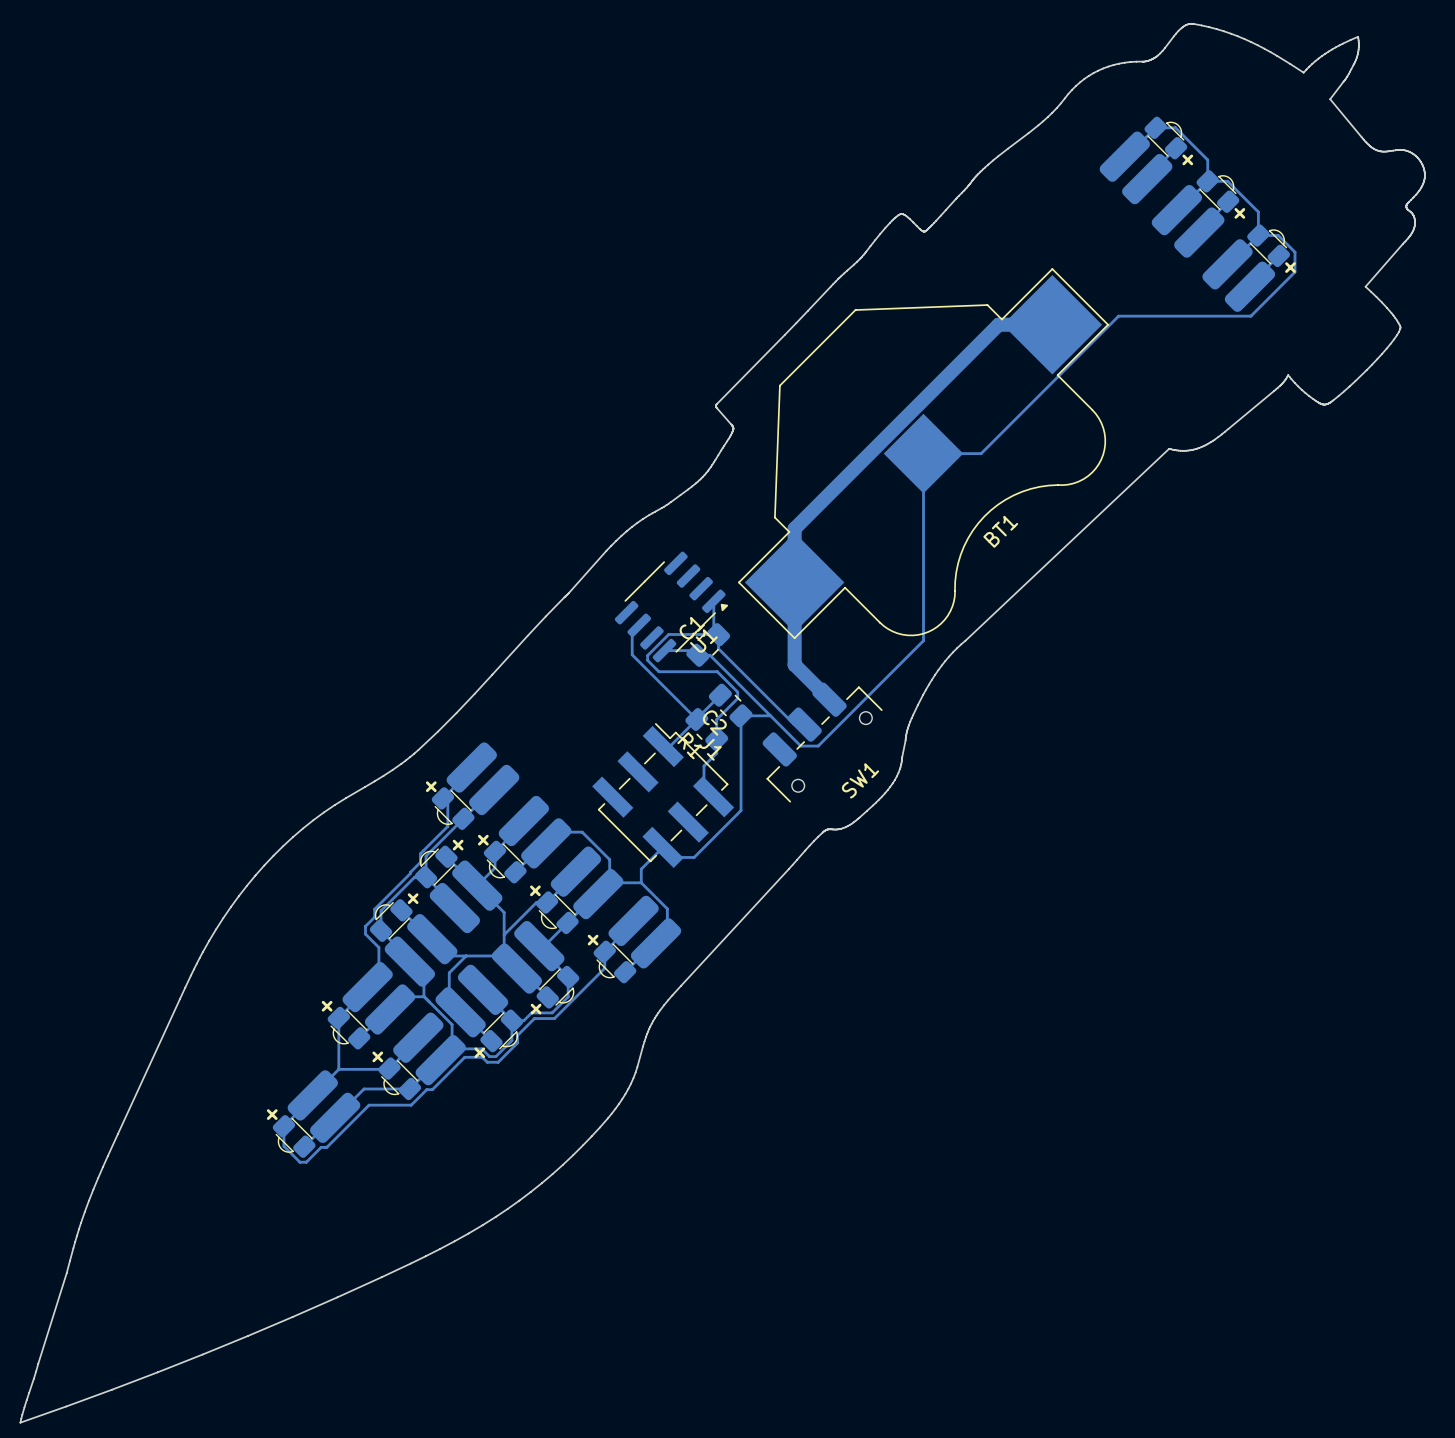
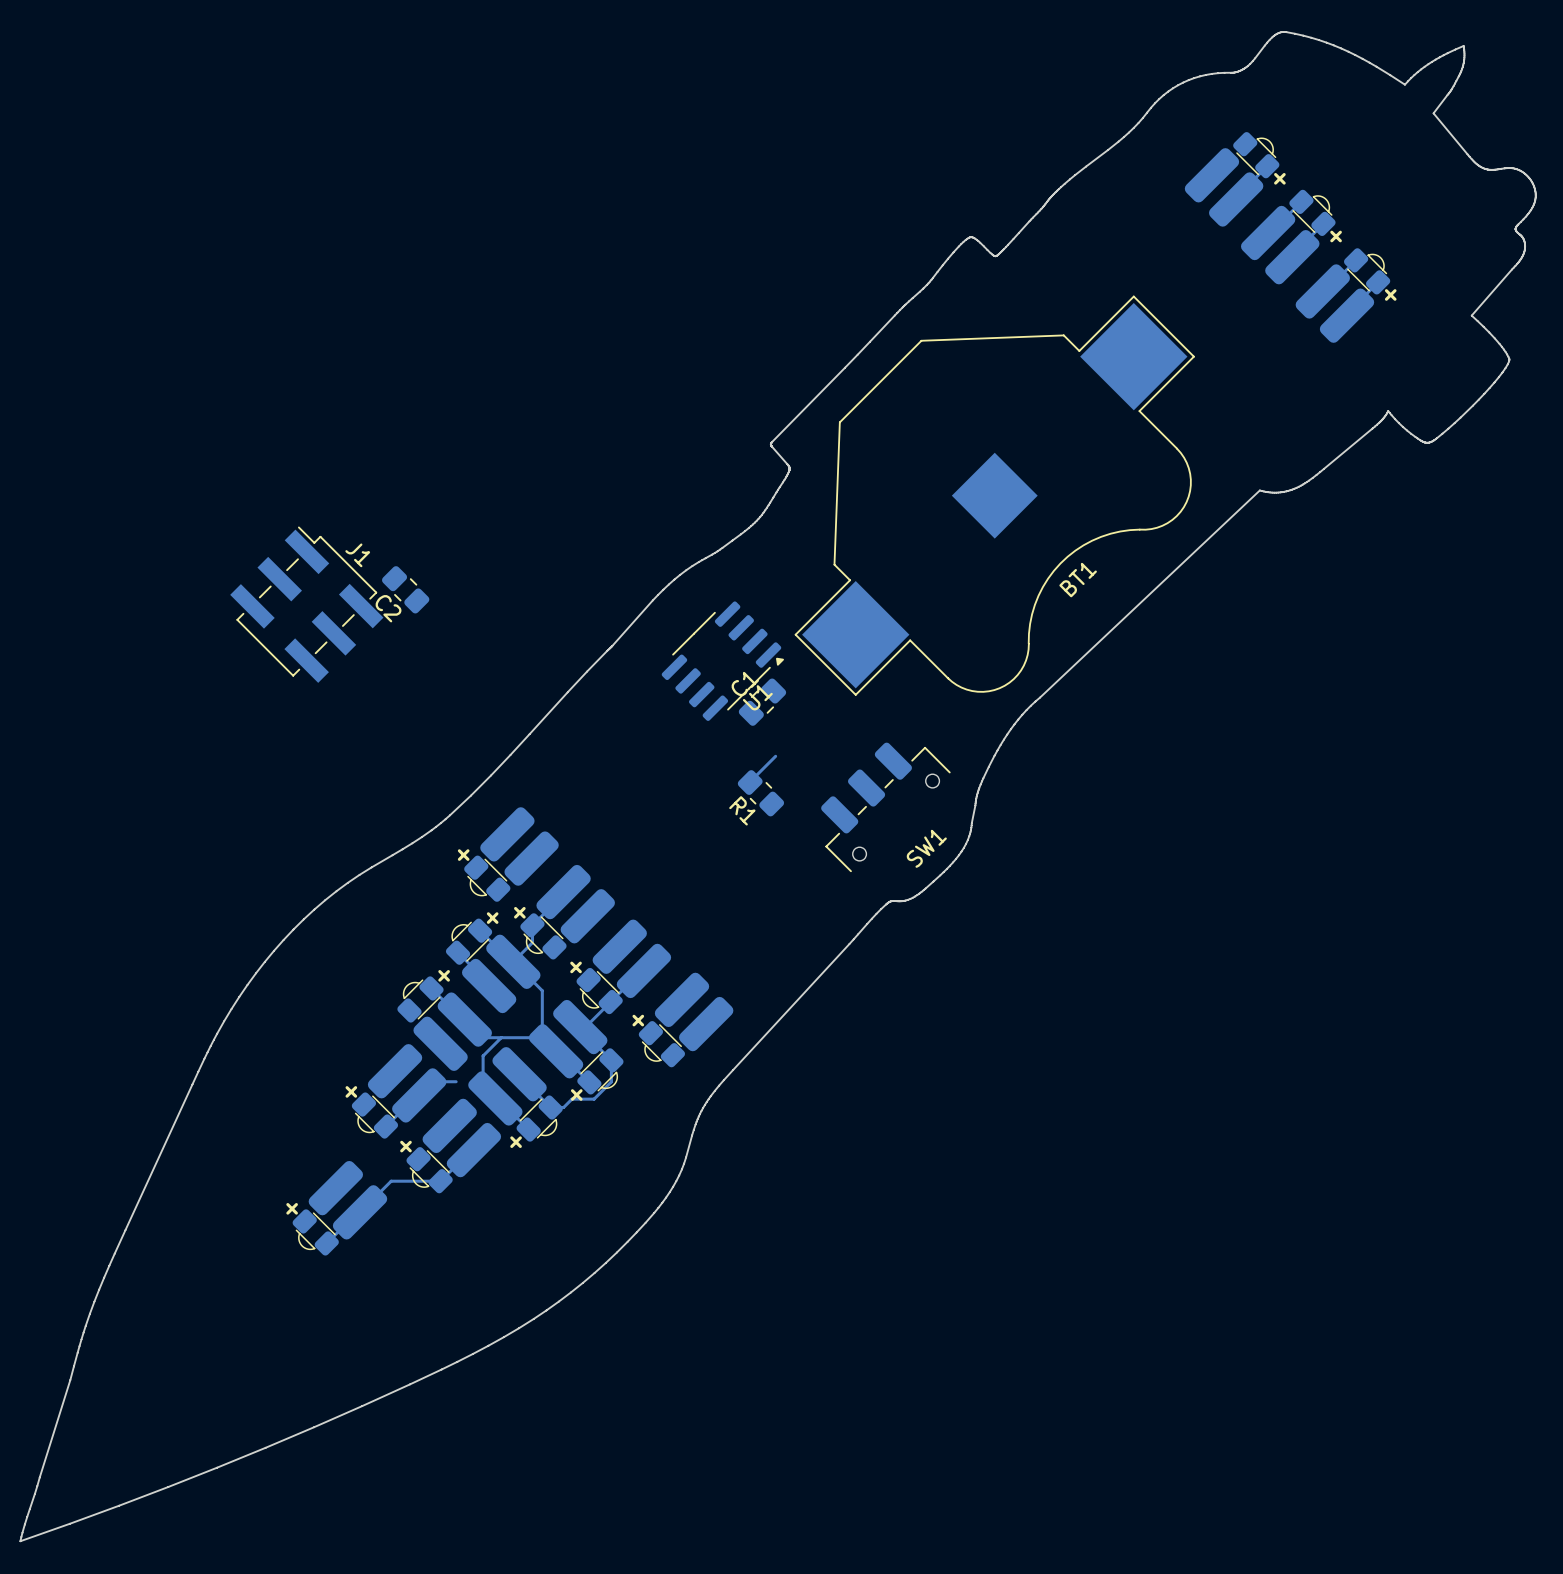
track: (1124, 156) (1155, 127) (1175, 127) (1207, 159) (1207, 181) (1227, 181) (1258, 212) (1258, 235) (1278, 235) (1295, 252) (1295, 272) (1250, 316) (1118, 316) (981, 453) (923, 453) (923, 640) (818, 746) (800, 746) (710, 655) (697, 655) (693, 650) (664, 650) -> none
track: (1052, 324) (998, 324) (794, 528) (794, 664) (829, 699) -> none
track: (713, 601) (713, 629) (718, 634) (718, 648) (794, 724) (804, 724) -> none
track: (639, 625) (632, 632) (632, 654) (696, 719) (669, 746) (663, 746) -> none
track: (718, 634) (668, 634) (647, 655) (647, 660) (658, 671) (717, 671) (737, 692) (737, 698) (716, 719) (716, 753) (703, 766) (703, 787) (713, 796) -> none
C2 position: (730, 705) -> (405, 589)
track: (770, 715) (741, 715) (741, 810) (694, 857) (673, 857) (663, 847) (641, 869) (641, 882) -> none
track: (471, 767) (442, 798) (447, 803) (447, 826) (420, 853) (420, 862) (374, 909) (374, 917) (365, 926) (365, 934) (378, 947) (378, 975) (338, 1017) (338, 1069) -> none
track: (494, 789) (426, 856) (426, 877) (414, 877) (381, 910) (381, 930) (423, 975) (423, 996) (452, 1024) (452, 1048) (481, 1048) (489, 1056) (495, 1056) (511, 1040) (511, 1020) -> none
J1 position: (663, 795) -> (306, 604)
track: (575, 871) (547, 902) (536, 902) (504, 934) -> none
track: (515, 872) (557, 832) (582, 832) (609, 859) (609, 882) (641, 882) -> none
track: (641, 882) (667, 908) (667, 932) (625, 972) -> none
track: (633, 920) (604, 951) (604, 968) (554, 1018) (534, 1018) (517, 1035) (517, 1042) (498, 1062) (487, 1062) (482, 1057) (464, 1057) (432, 1089) (426, 1089) (411, 1105) (369, 1105) (325, 1147) -> none
track: (418, 1037) (388, 1069) (338, 1069) -> none
track: (338, 1069) (283, 1126) (283, 1146) (299, 1162) (306, 1162) (321, 1147) (325, 1147) -> none

